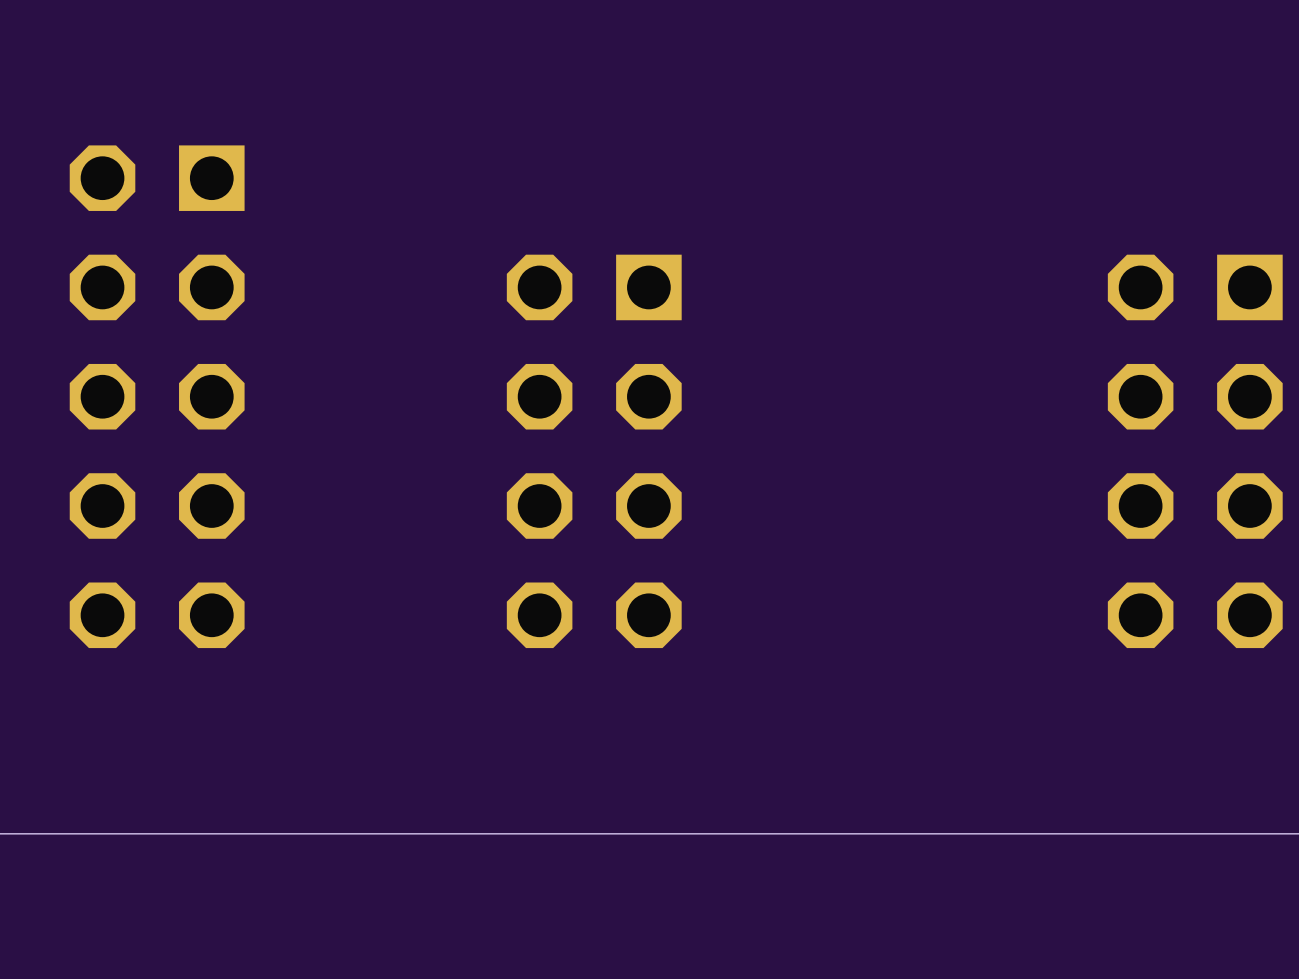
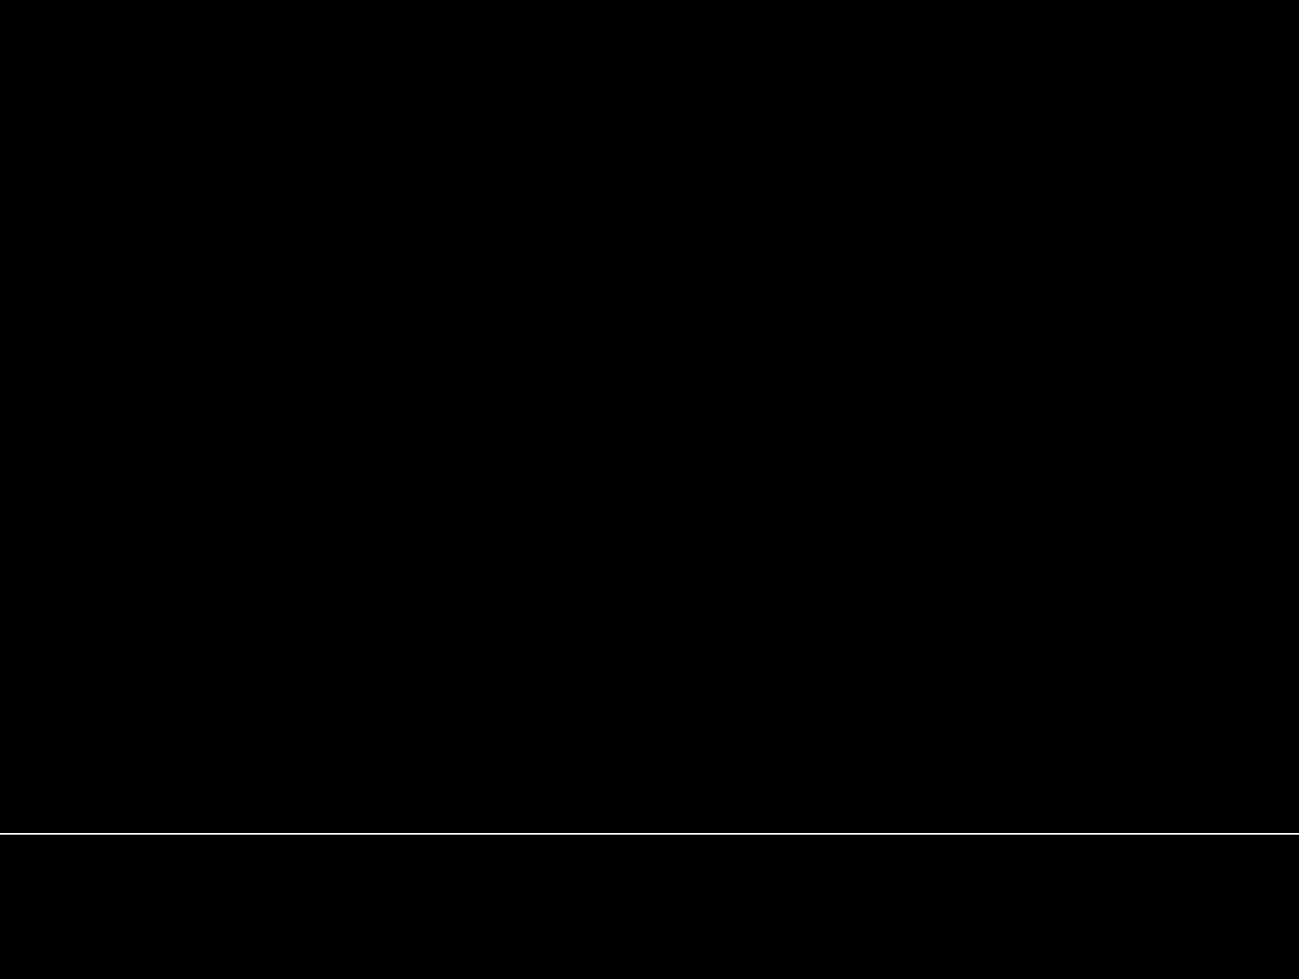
part: (157, 396) -> none
part: (594, 451) -> none
part: (1195, 451) -> none

